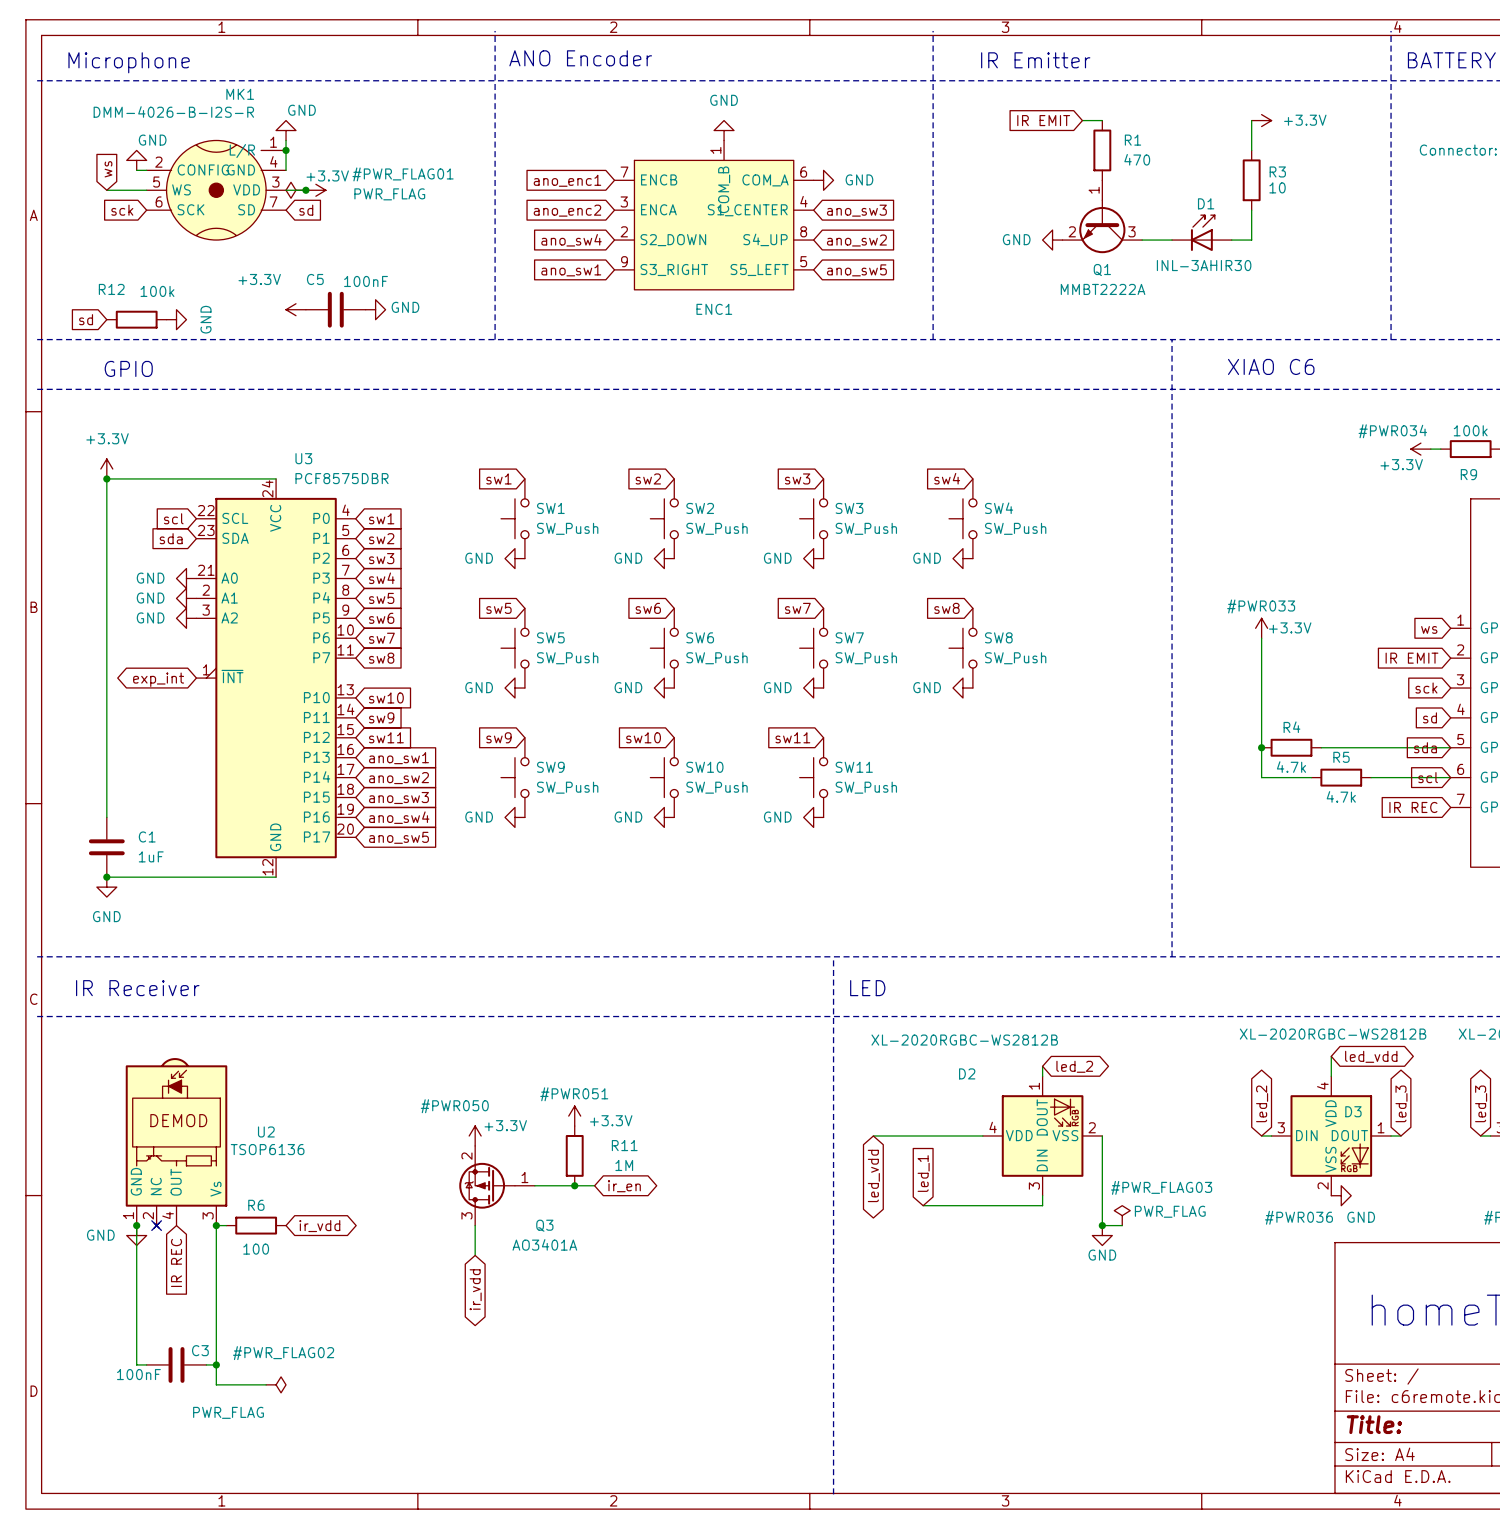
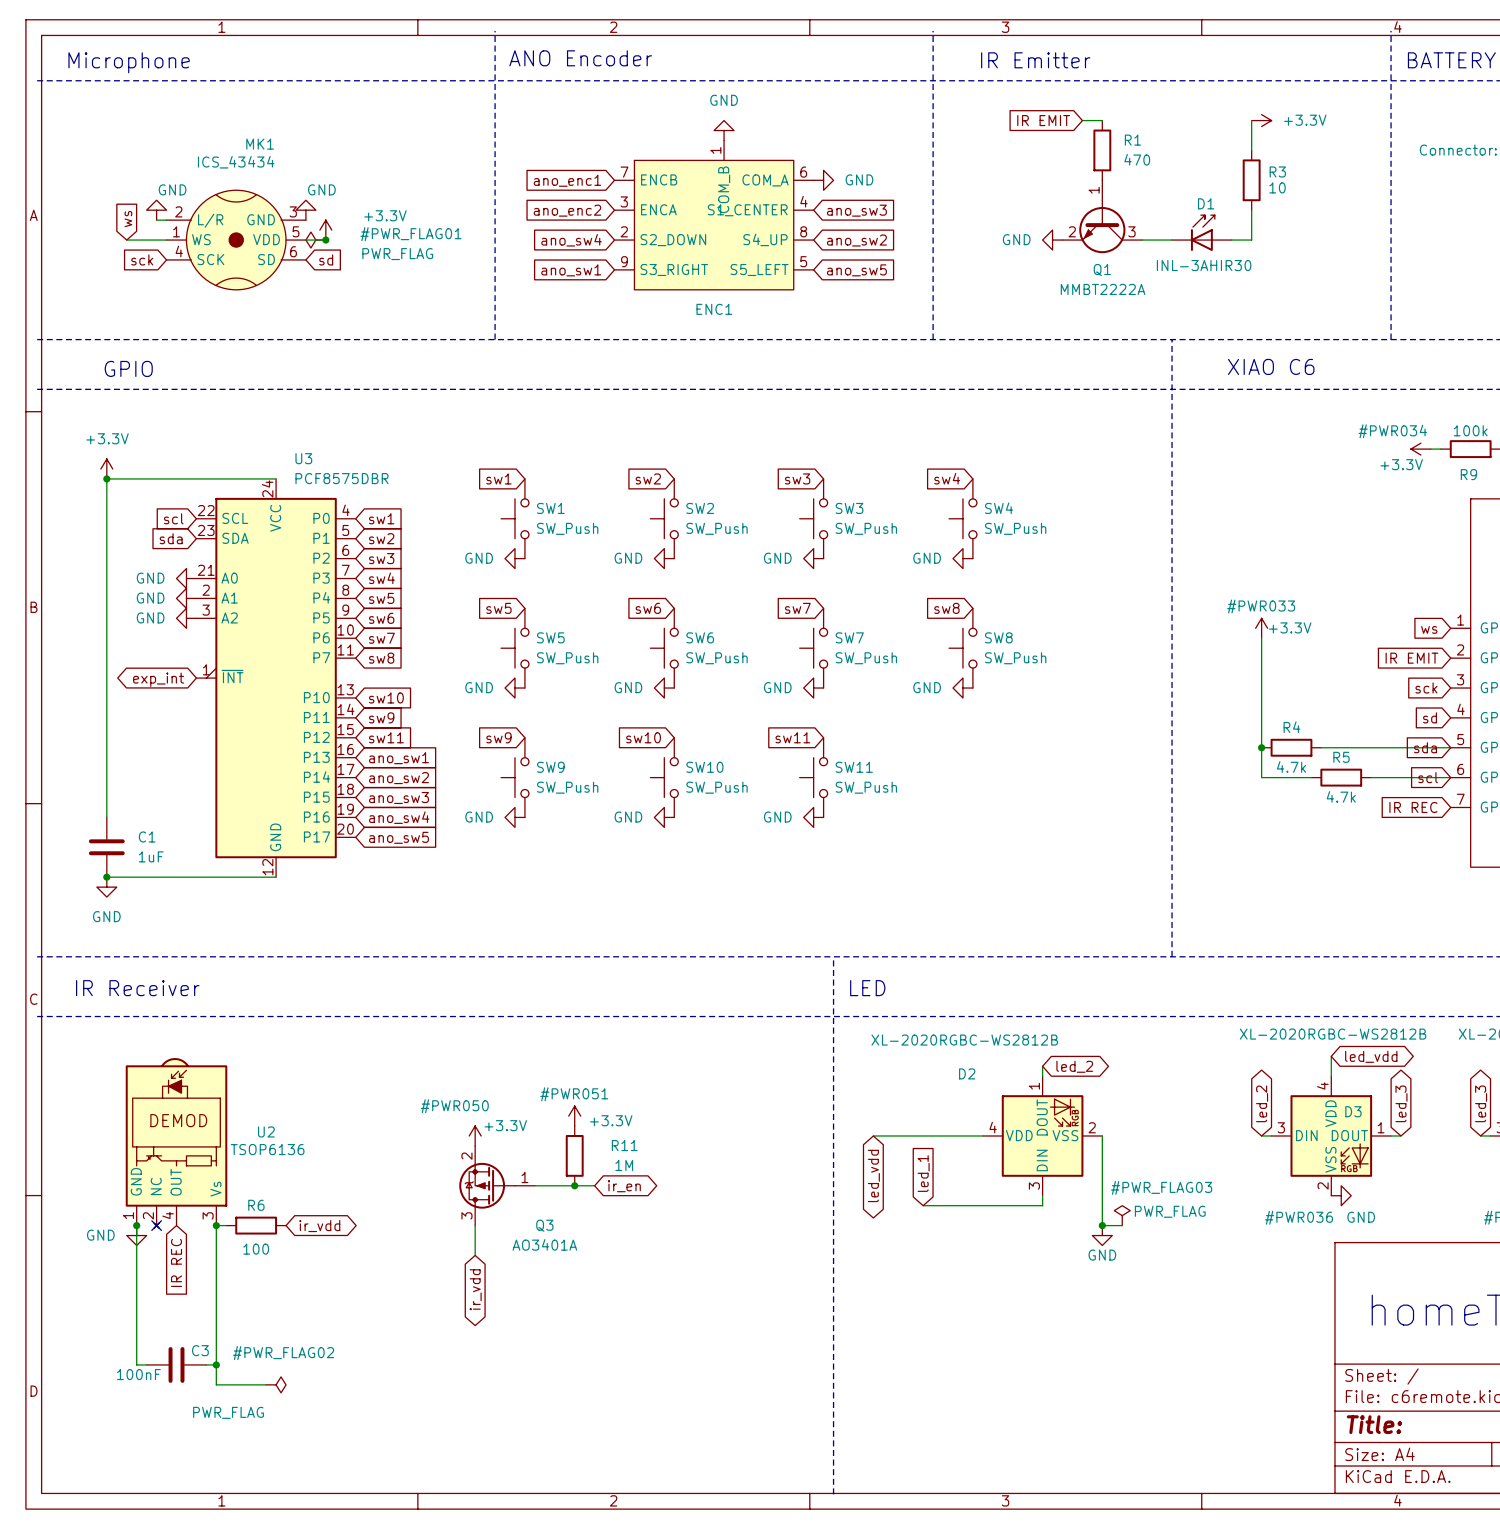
MK1 value: DMM-4026-B-I2S-R (173, 112) -> ICS_43434 (236, 162)
power symbol: GND (286, 130) -> none
MK1 symbol: [146, 140, 287, 241] -> [166, 190, 306, 290]
wire: (286, 140) (286, 170) -> none
junction: (286, 150) -> none
power symbol position: GND (136, 160) -> GND (156, 210)
global label position: ws (108, 169) -> ws (128, 219)
wire: (136, 170) (146, 170) -> (156, 220) (166, 220)
#PWR_FLAG01 name position: #PWR_FLAG01 (403, 174) -> #PWR_FLAG01 (410, 234)
power symbol text position: +3.3V (327, 175) -> +3.3V (385, 215)
wire: (106, 190) (146, 190) -> (126, 240) (166, 240)
wire: (286, 190) (305, 190) -> (305, 240) (325, 240)
#PWR_FLAG01 position: PWR_FLAG (295, 190) -> PWR_FLAG (315, 240)
junction: (305, 190) -> none
power symbol rotation: 0° (315, 190) -> 90° counterclockwise (325, 230)
power symbol position: +3.3V (315, 190) -> +3.3V (325, 230)
#PWR_FLAG01 text position: PWR_FLAG (389, 194) -> PWR_FLAG (397, 254)
global label position: sck (122, 210) -> sck (142, 259)
power symbol: none -> GND (305, 210)
global label position: sd (306, 210) -> sd (326, 259)
junction: none -> (325, 240)
power symbol: +3.3V (295, 309) -> none
C5: 100nF (335, 309) -> none
power symbol: GND (375, 309) -> none
global label: sd (86, 319) -> none
R12: 100k (136, 319) -> none
power symbol: GND (176, 319) -> none

